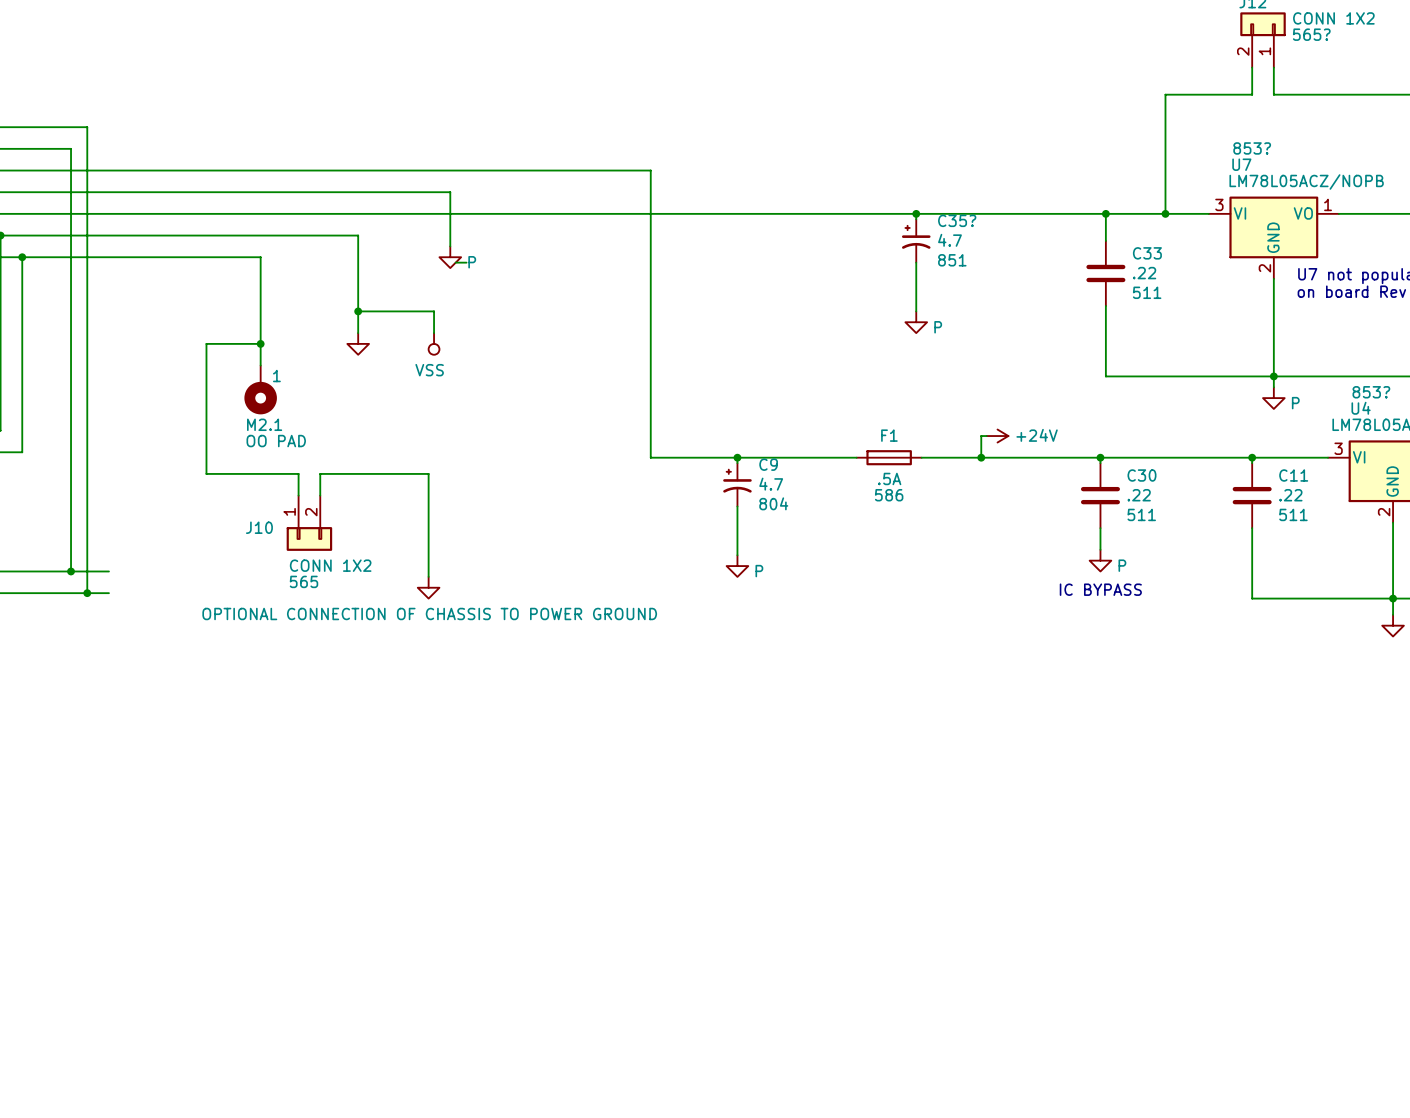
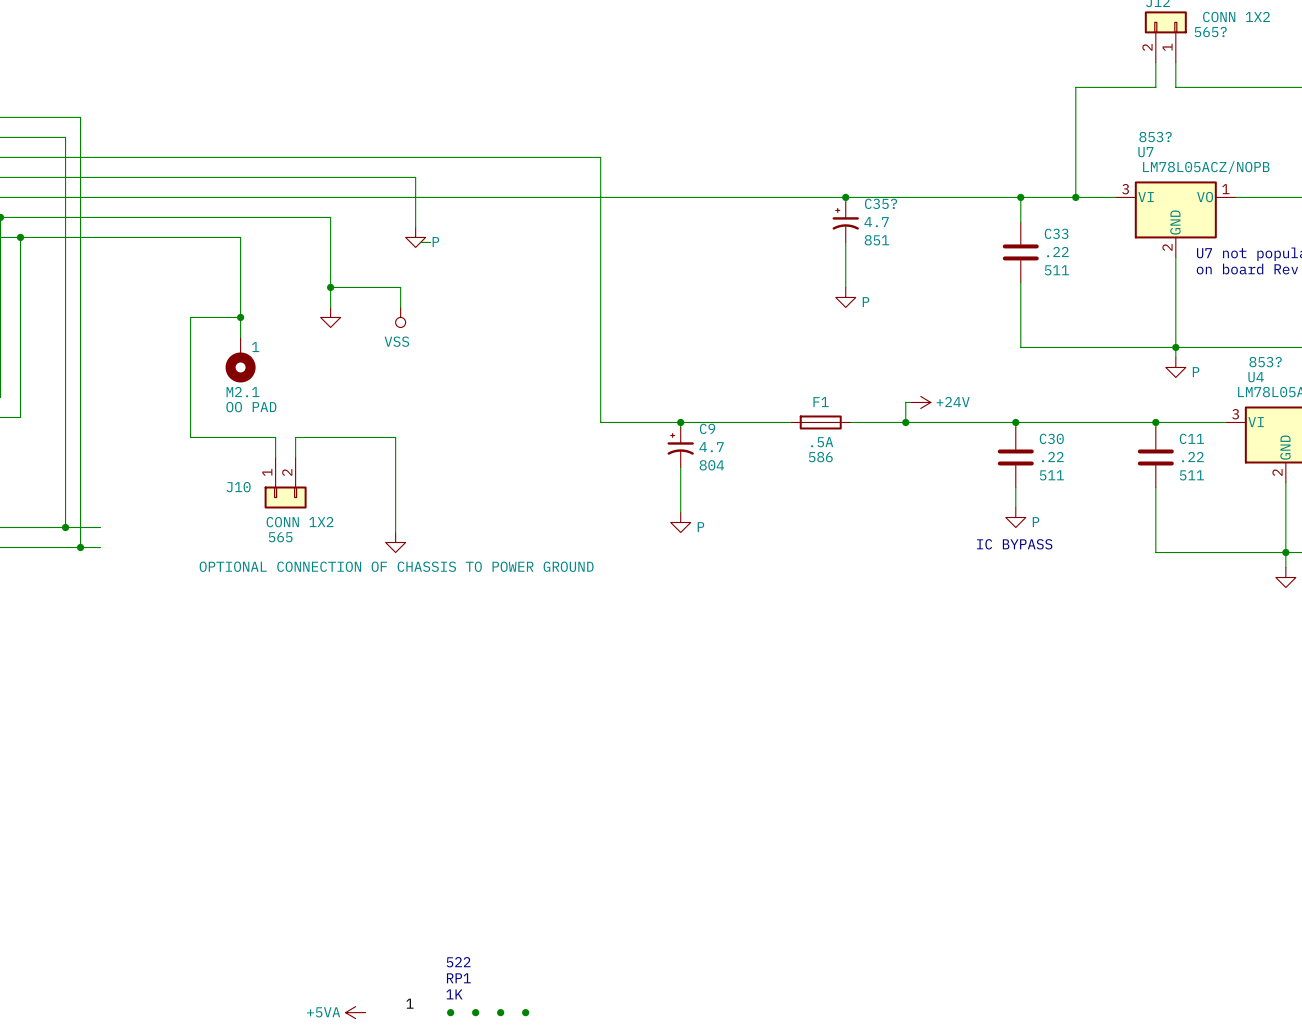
text: none -> 522 (458, 962)
text: none -> RP1 (458, 978)
text: none -> 1K (454, 994)
label: none -> 1 (409, 1003)
power symbol: none -> +5VA (355, 1012)
junction: none -> (450, 1012)
junction: none -> (475, 1012)
junction: none -> (500, 1012)
junction: none -> (525, 1012)

